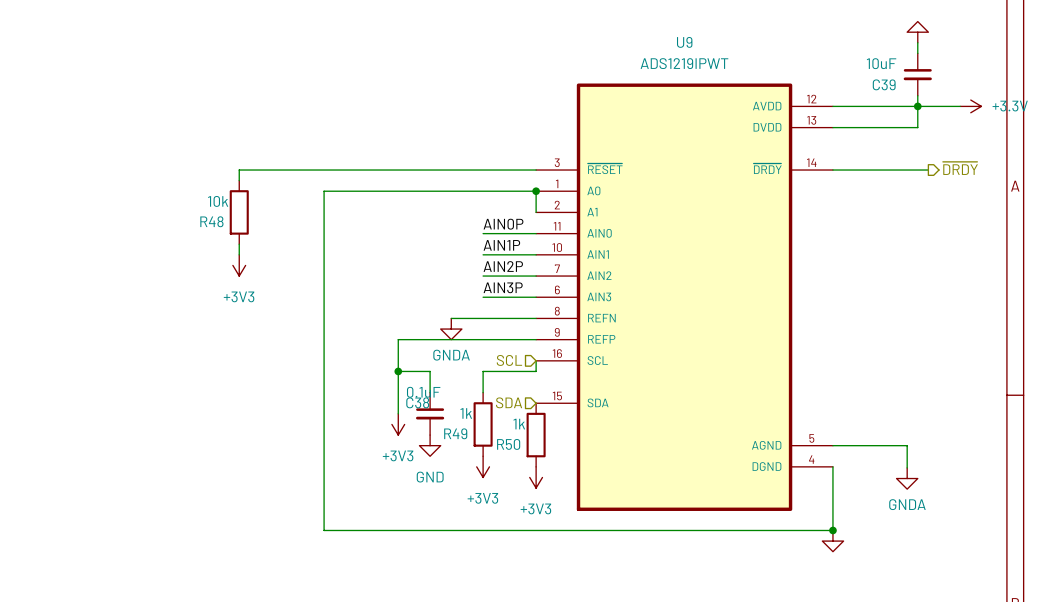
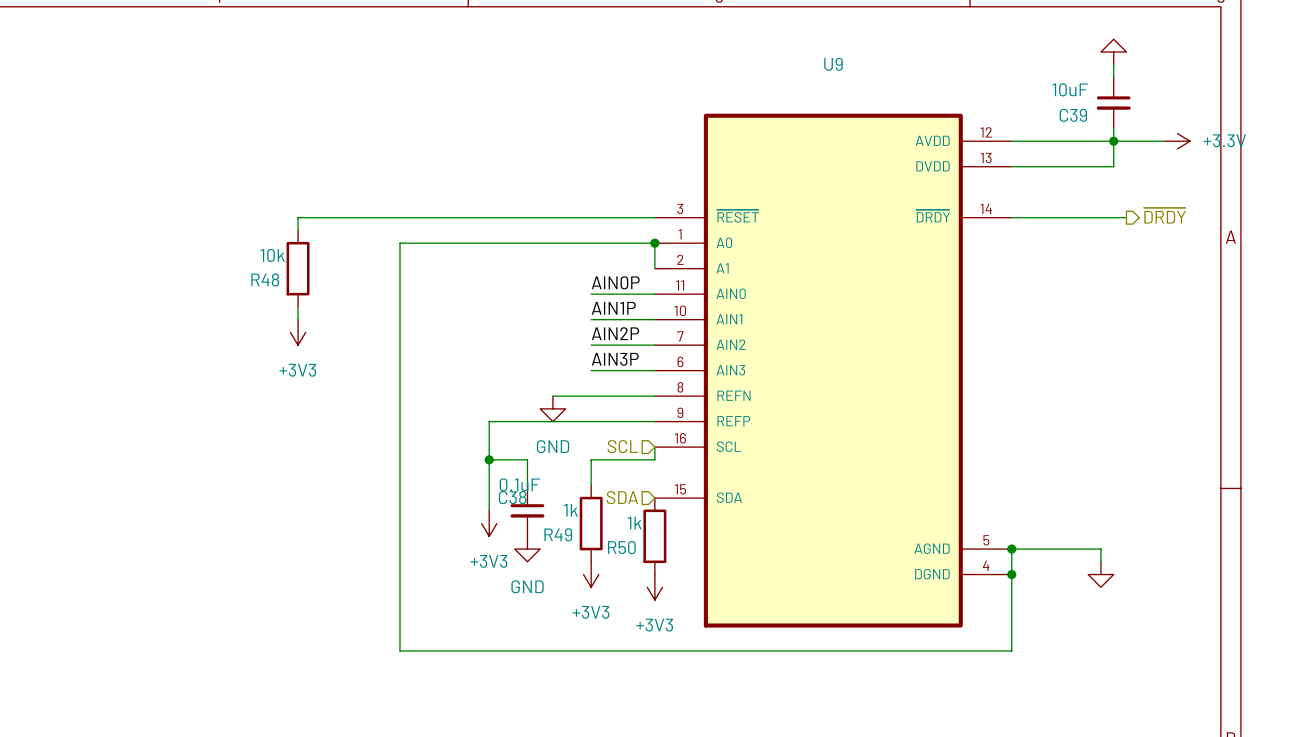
U9 value: ADS1219IPWT (684, 63) -> none
power symbol: GNDA (451, 329) -> GND (552, 408)
wire: none -> (1011, 549) (1011, 574)
junction: none -> (1011, 549)
junction: none -> (1011, 574)
power symbol: GNDA (907, 478) -> none
junction: (832, 530) -> none
power symbol position: (832, 541) -> (1100, 574)

